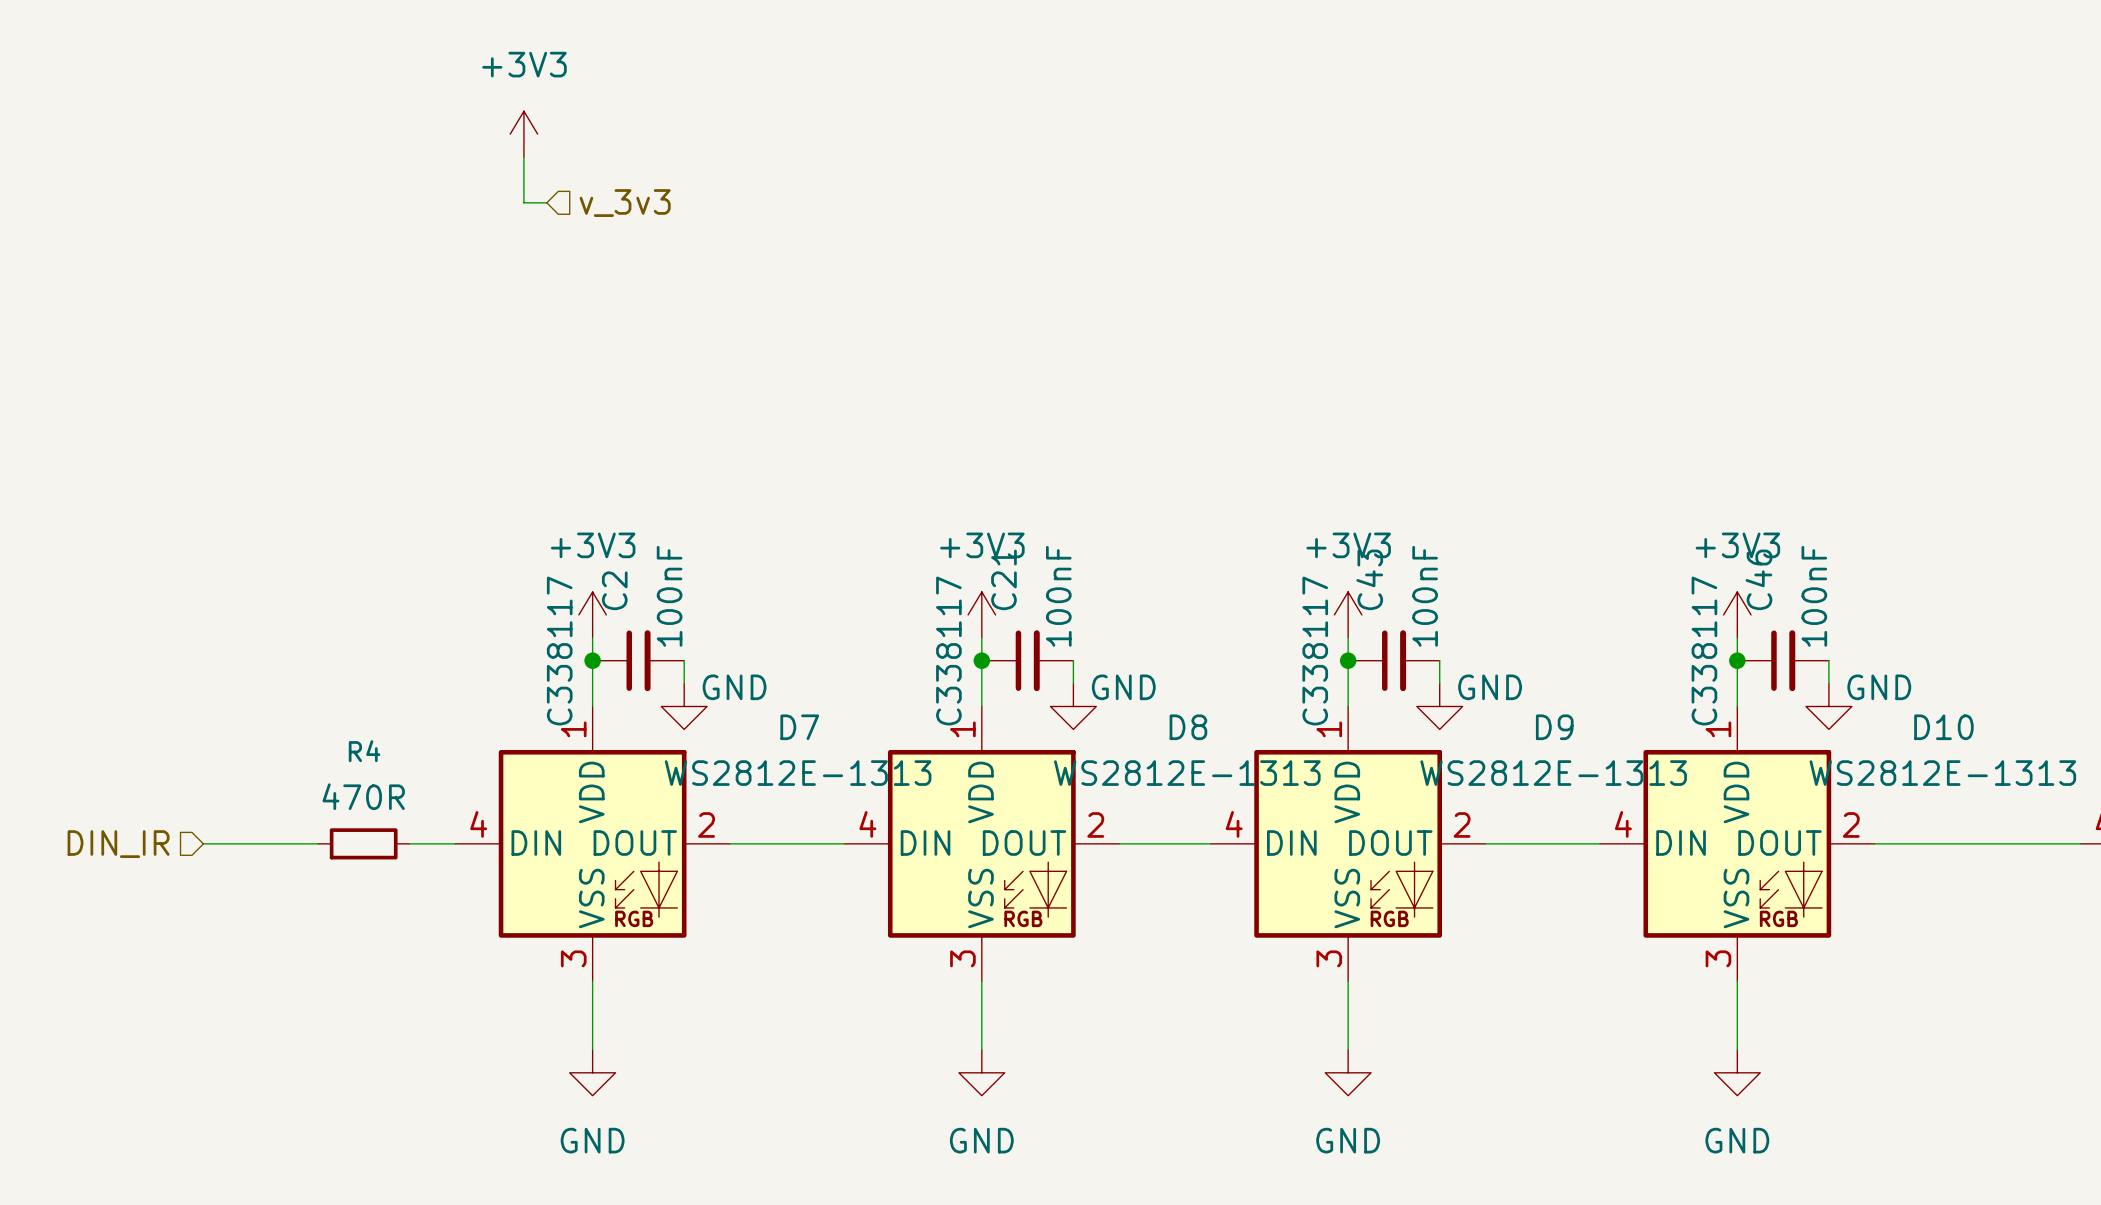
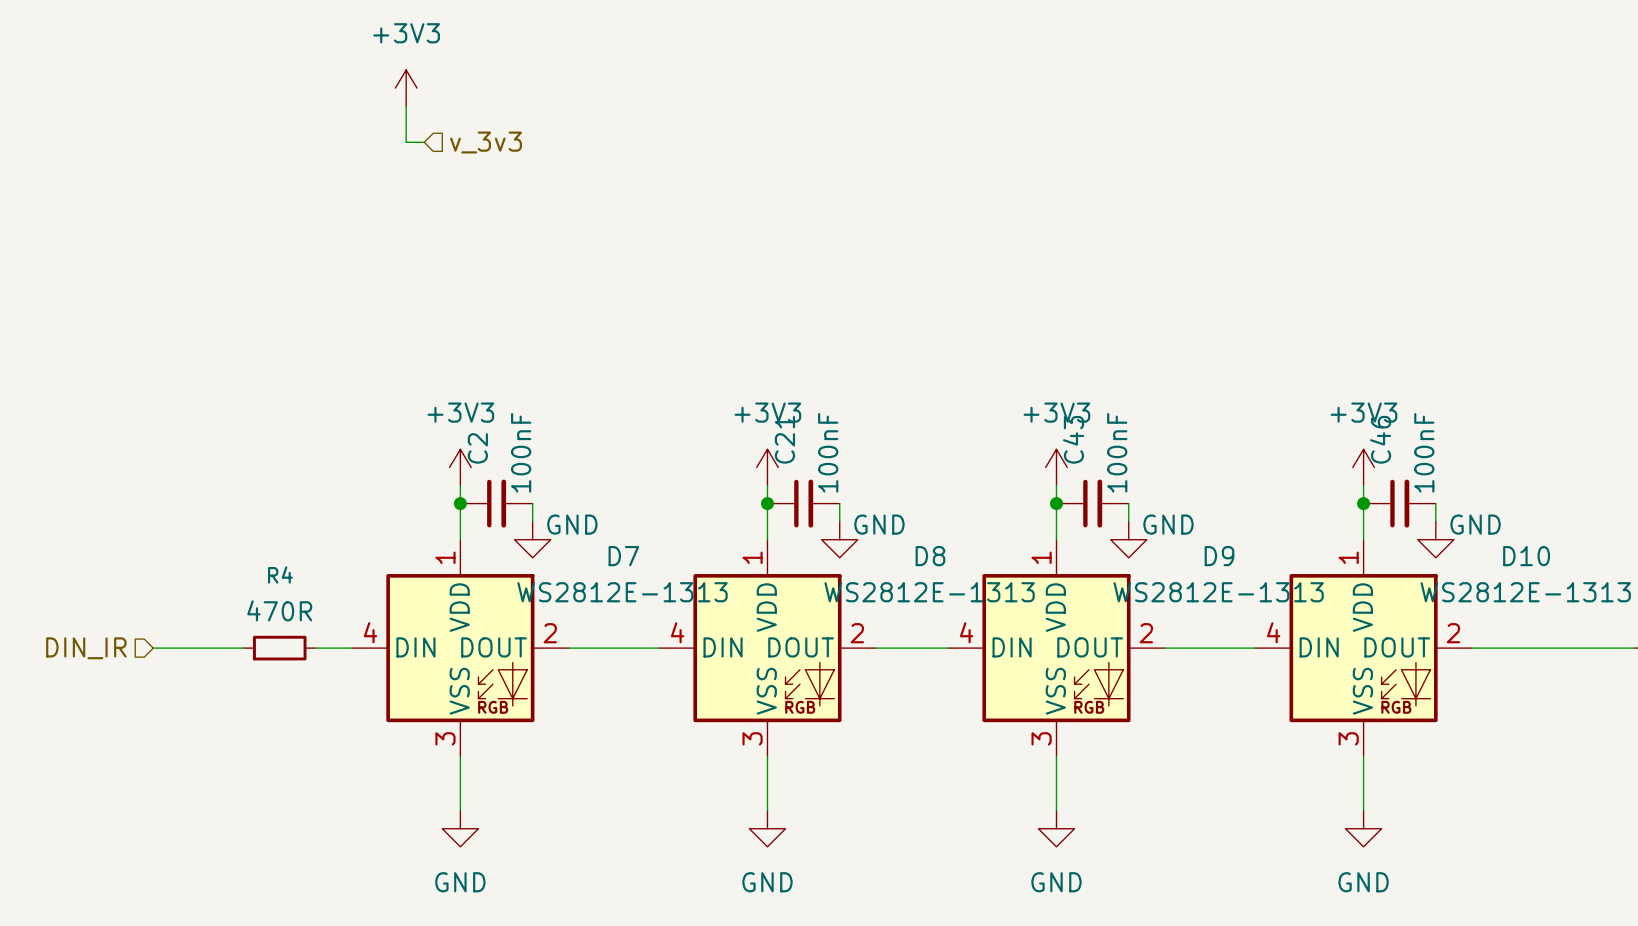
C2 text: C338117 (559, 651) -> none
C21 text: C338117 (948, 651) -> none
C43 text: C338117 (1315, 651) -> none
C46 text: C338117 (1704, 651) -> none

